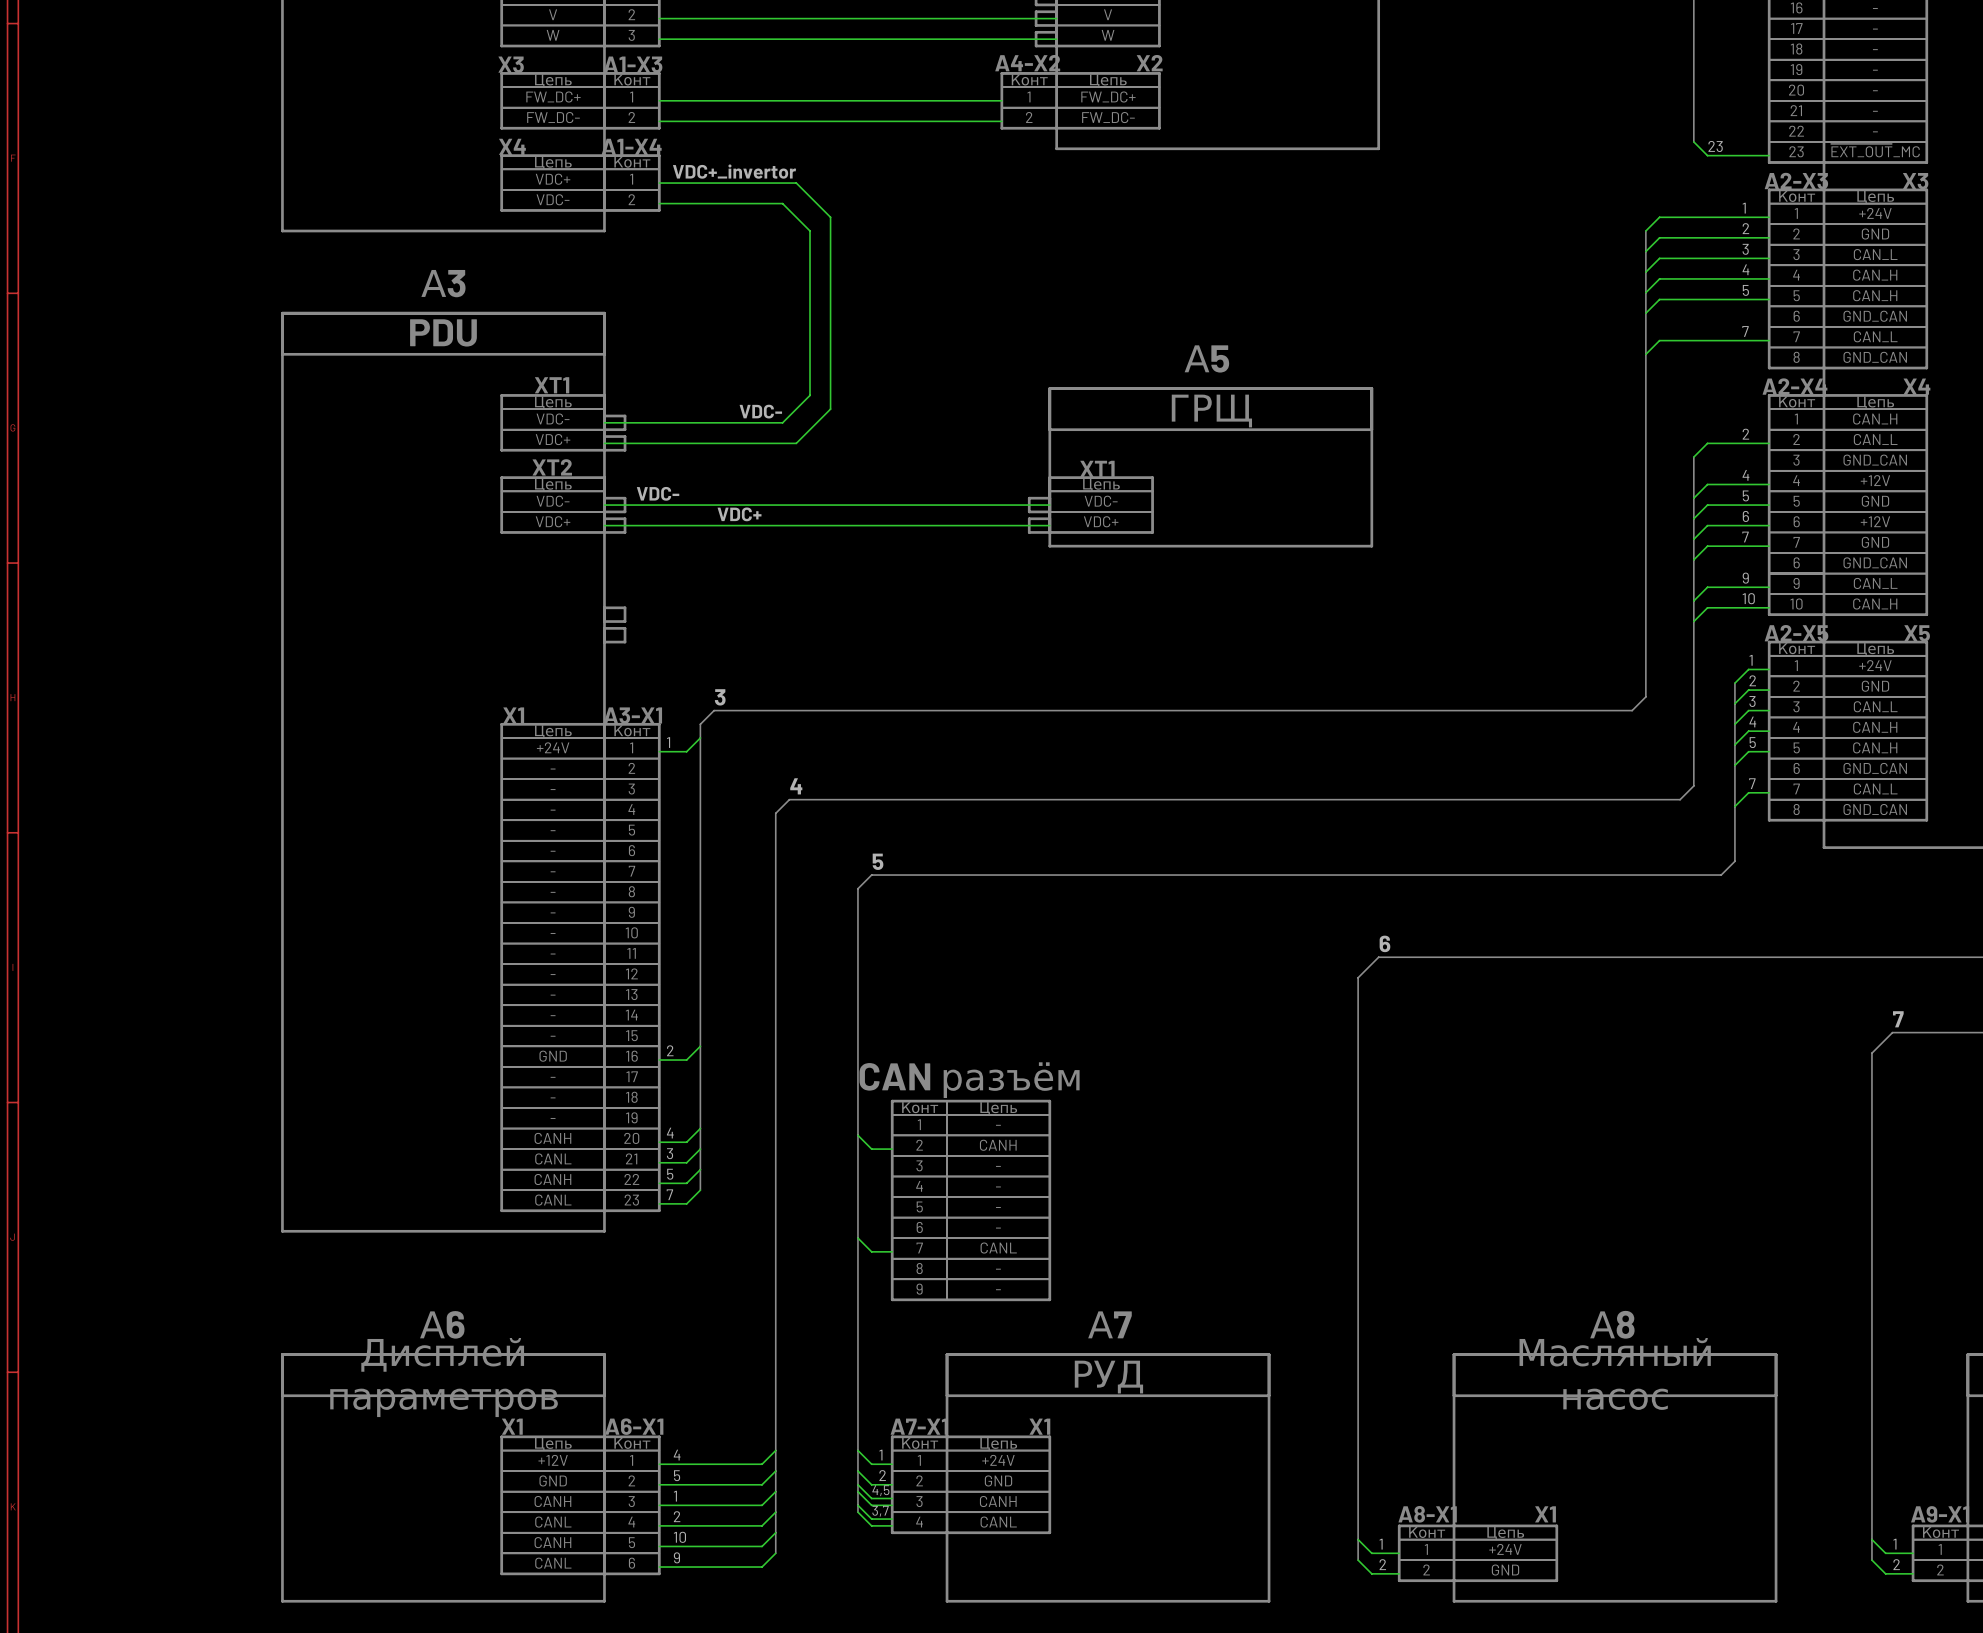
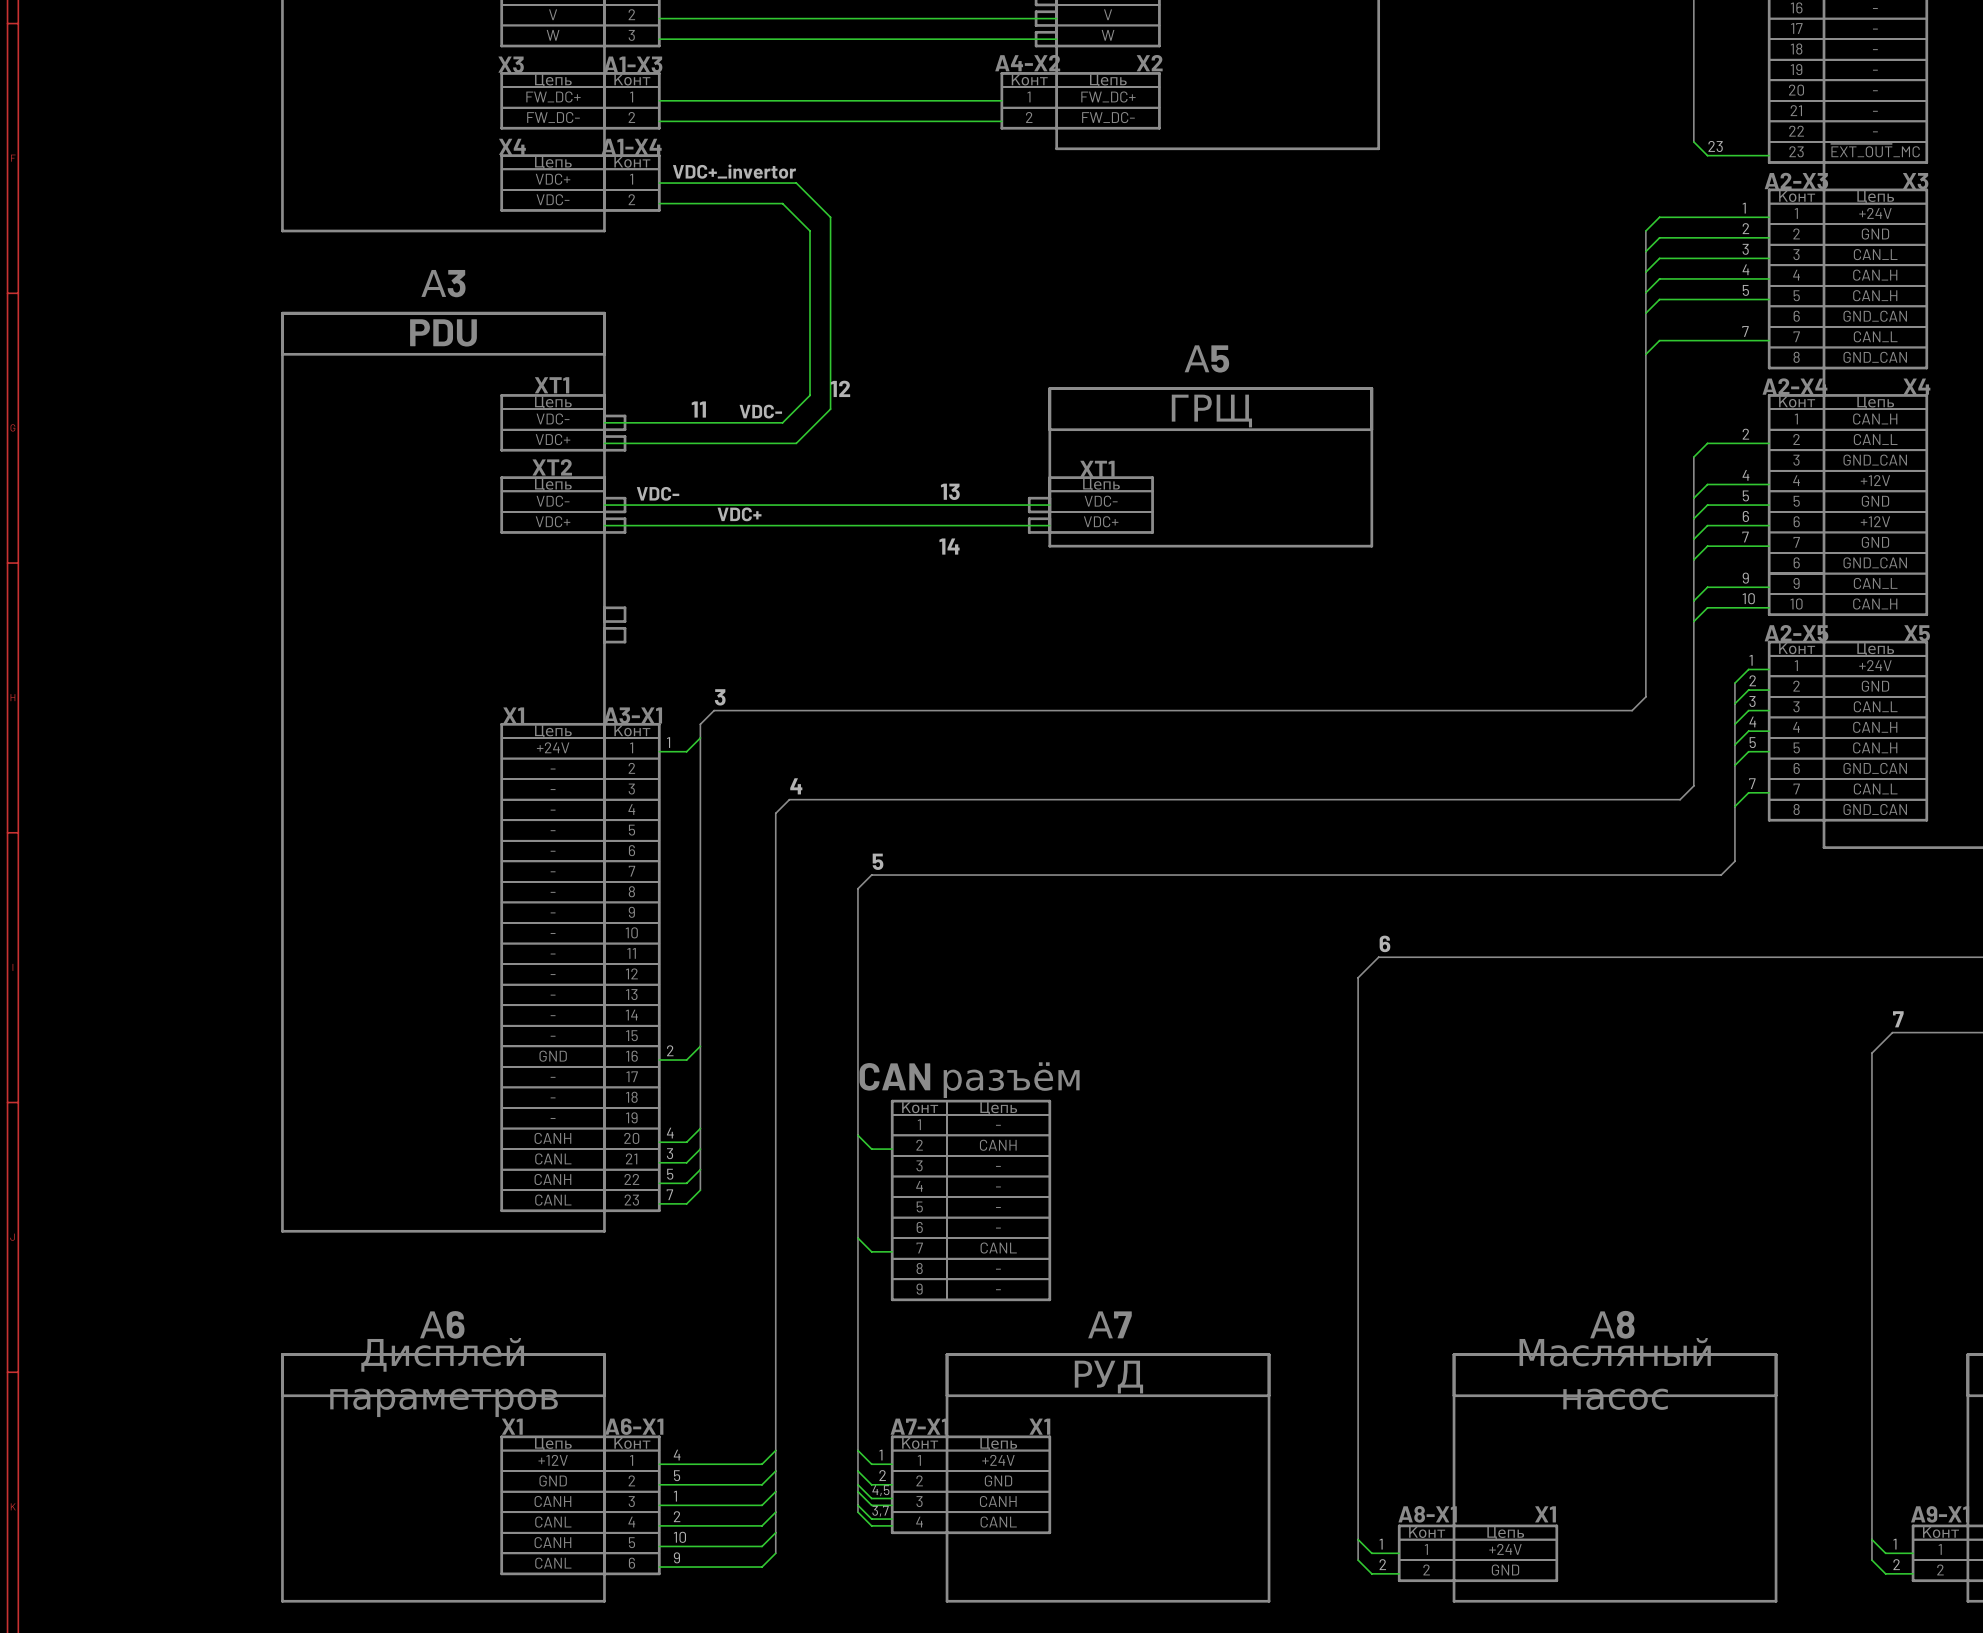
label: none -> 12 (840, 388)
label: none -> 11 (698, 409)
label: none -> 13 (950, 491)
label: none -> 14 (949, 546)

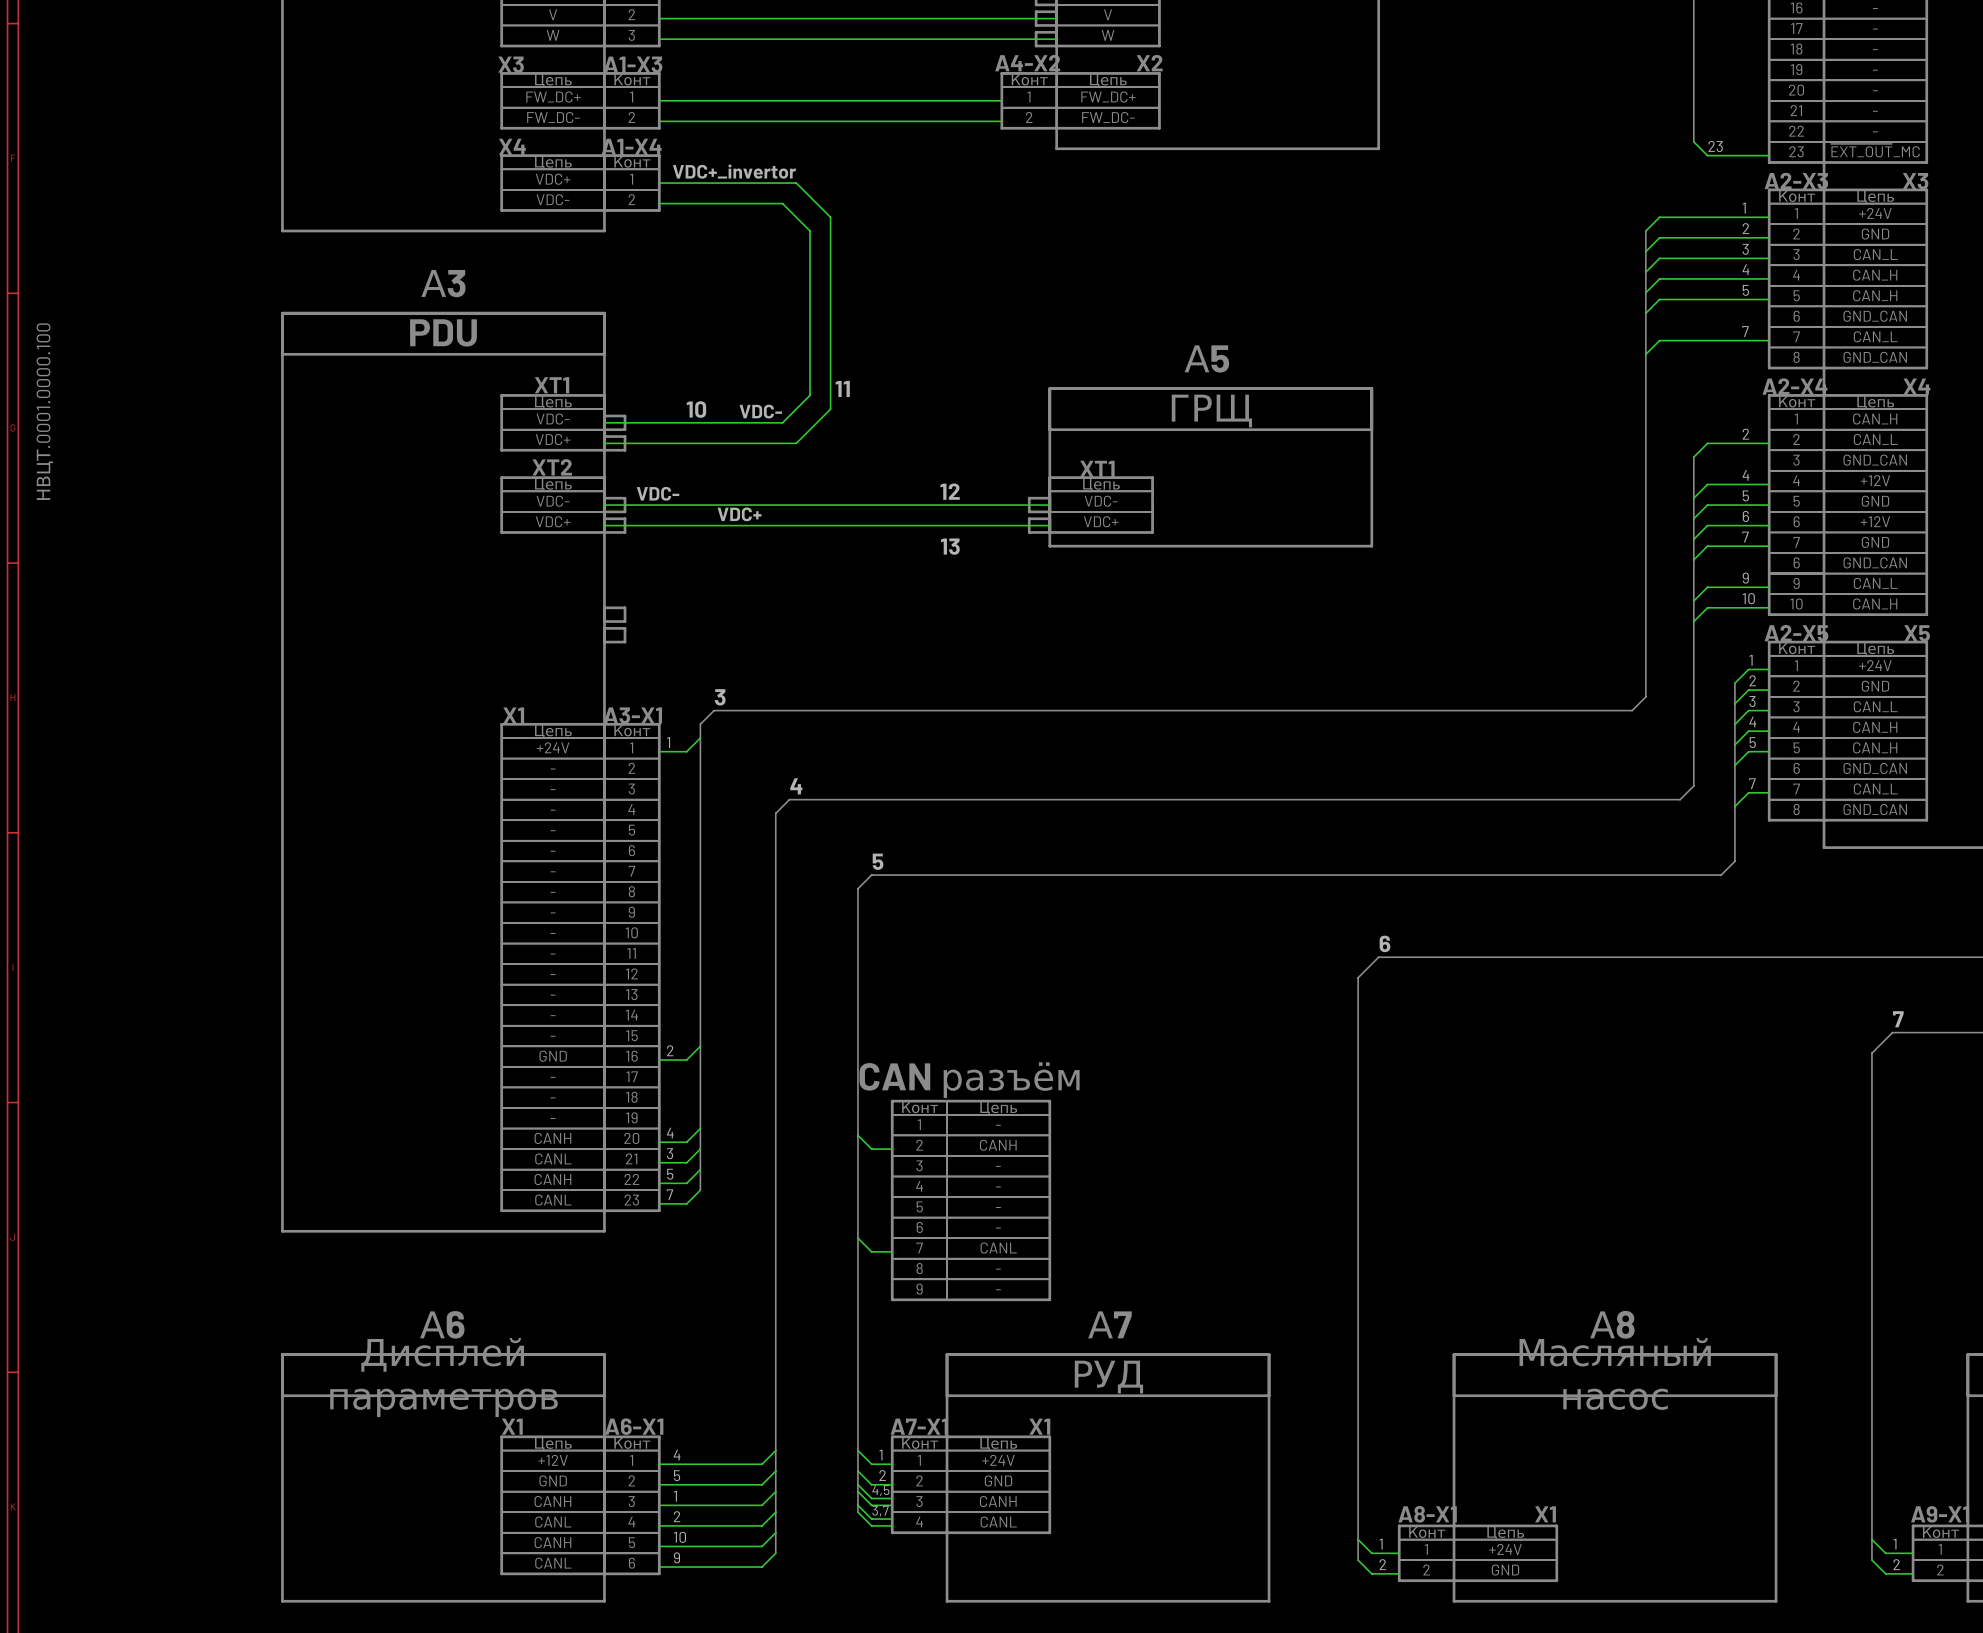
label: 12 (840, 388) -> 11 (842, 388)
label: 11 (698, 409) -> 10 (696, 409)
text: none -> НВЦТ.0001.0000.100 (44, 411)
label: 13 (950, 491) -> 12 (950, 491)
label: 14 (949, 546) -> 13 (950, 546)

